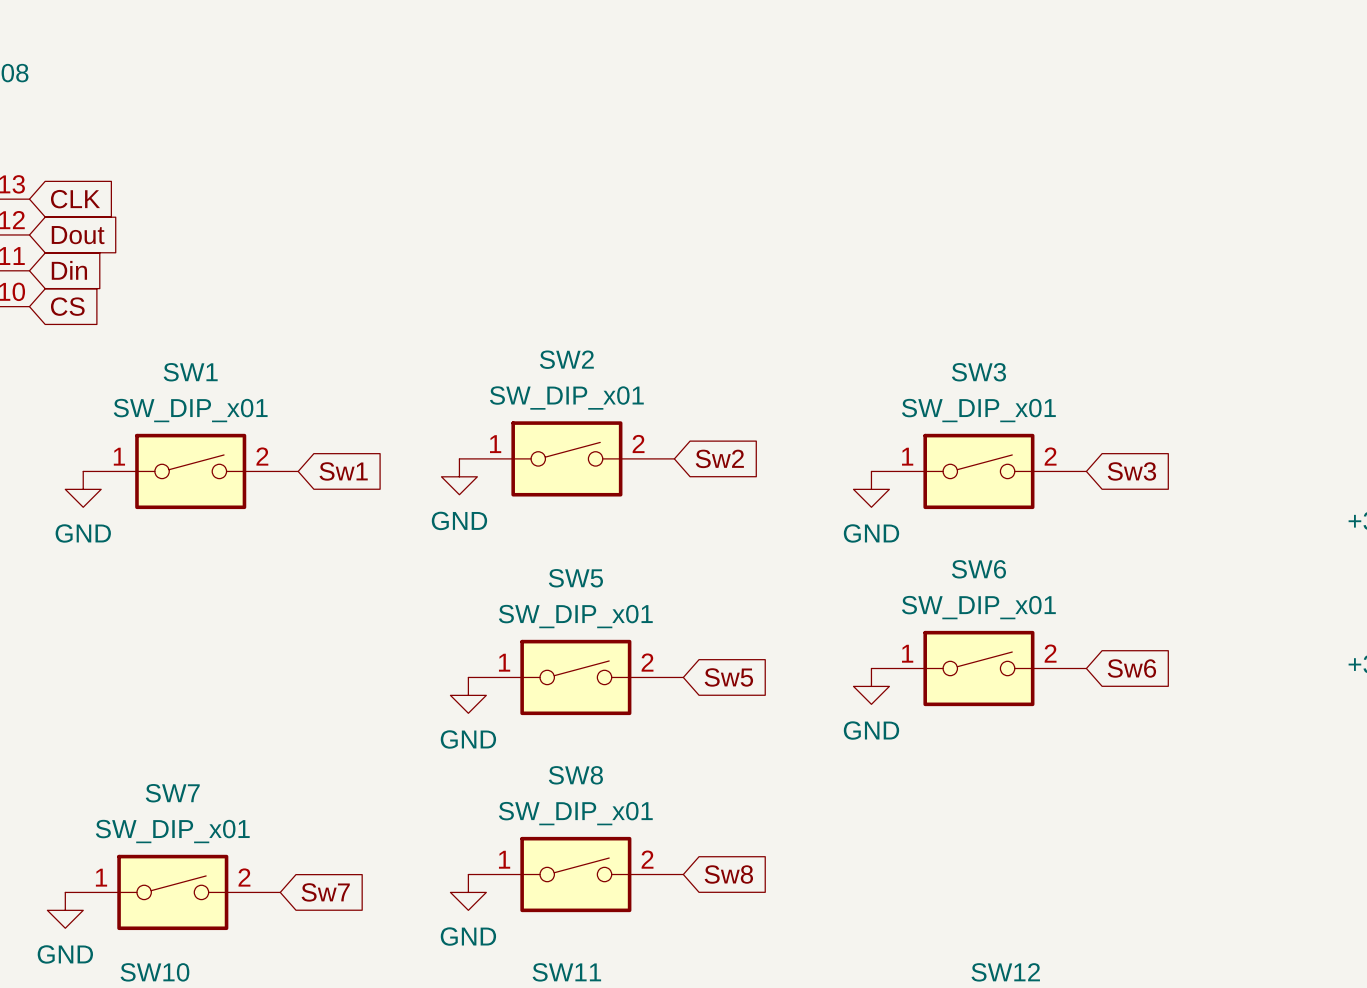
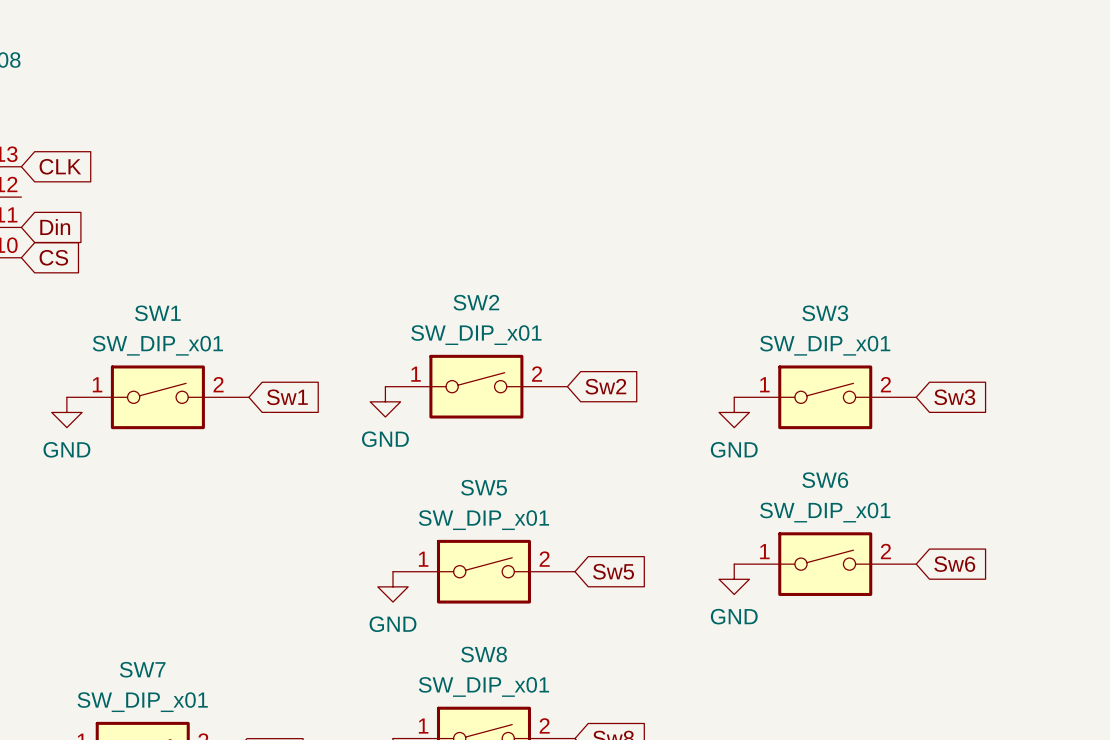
global label: Dout (78, 235) -> none

